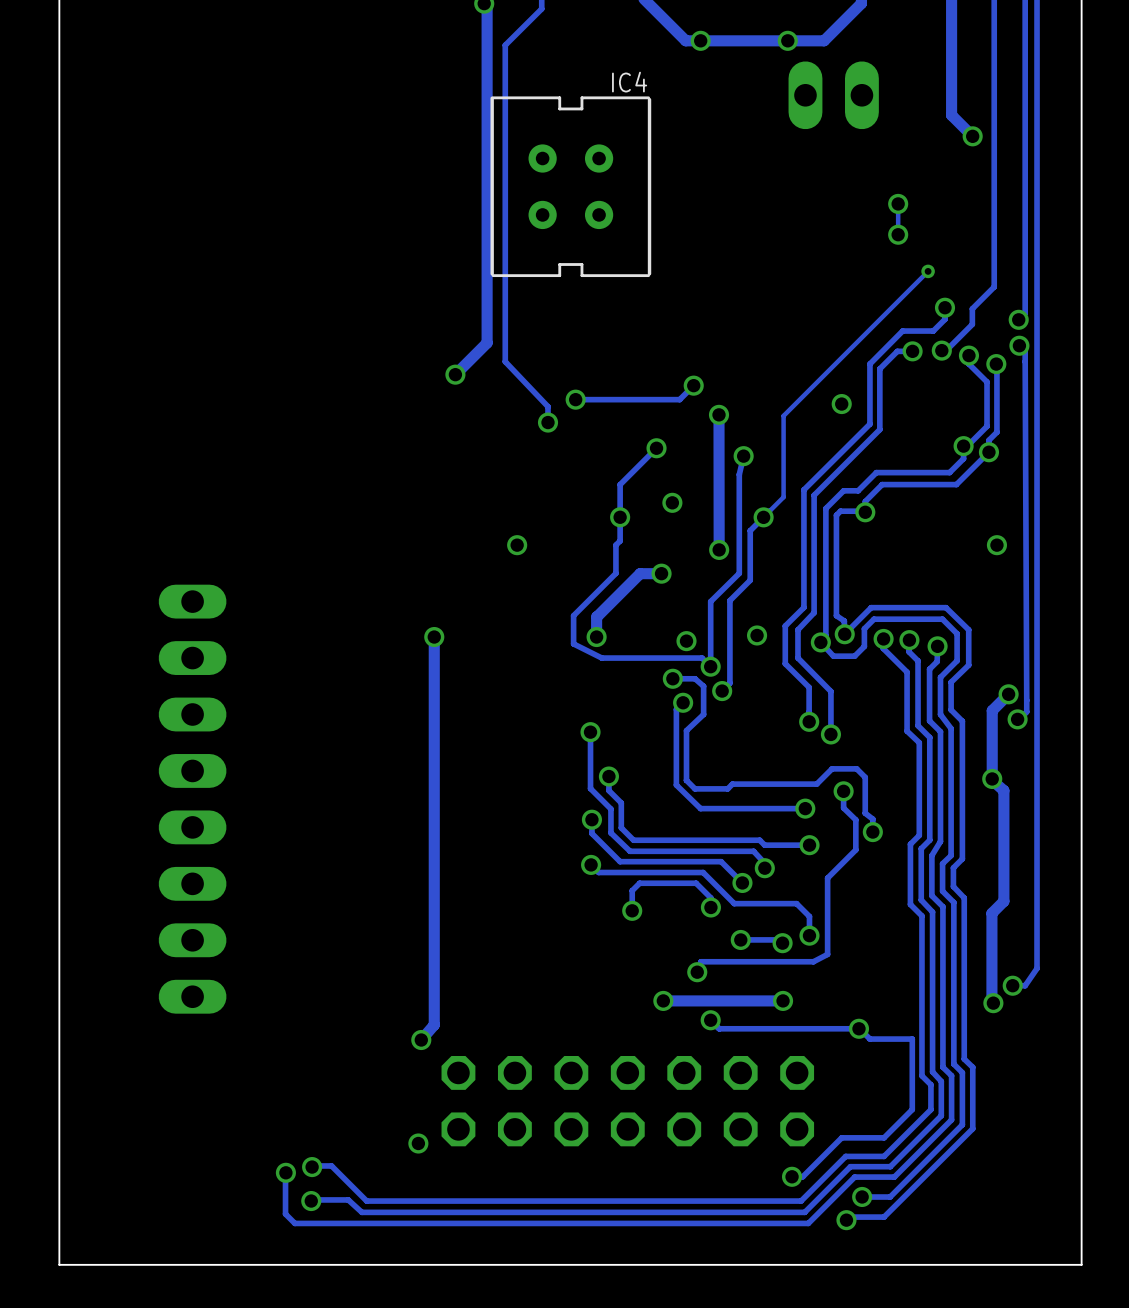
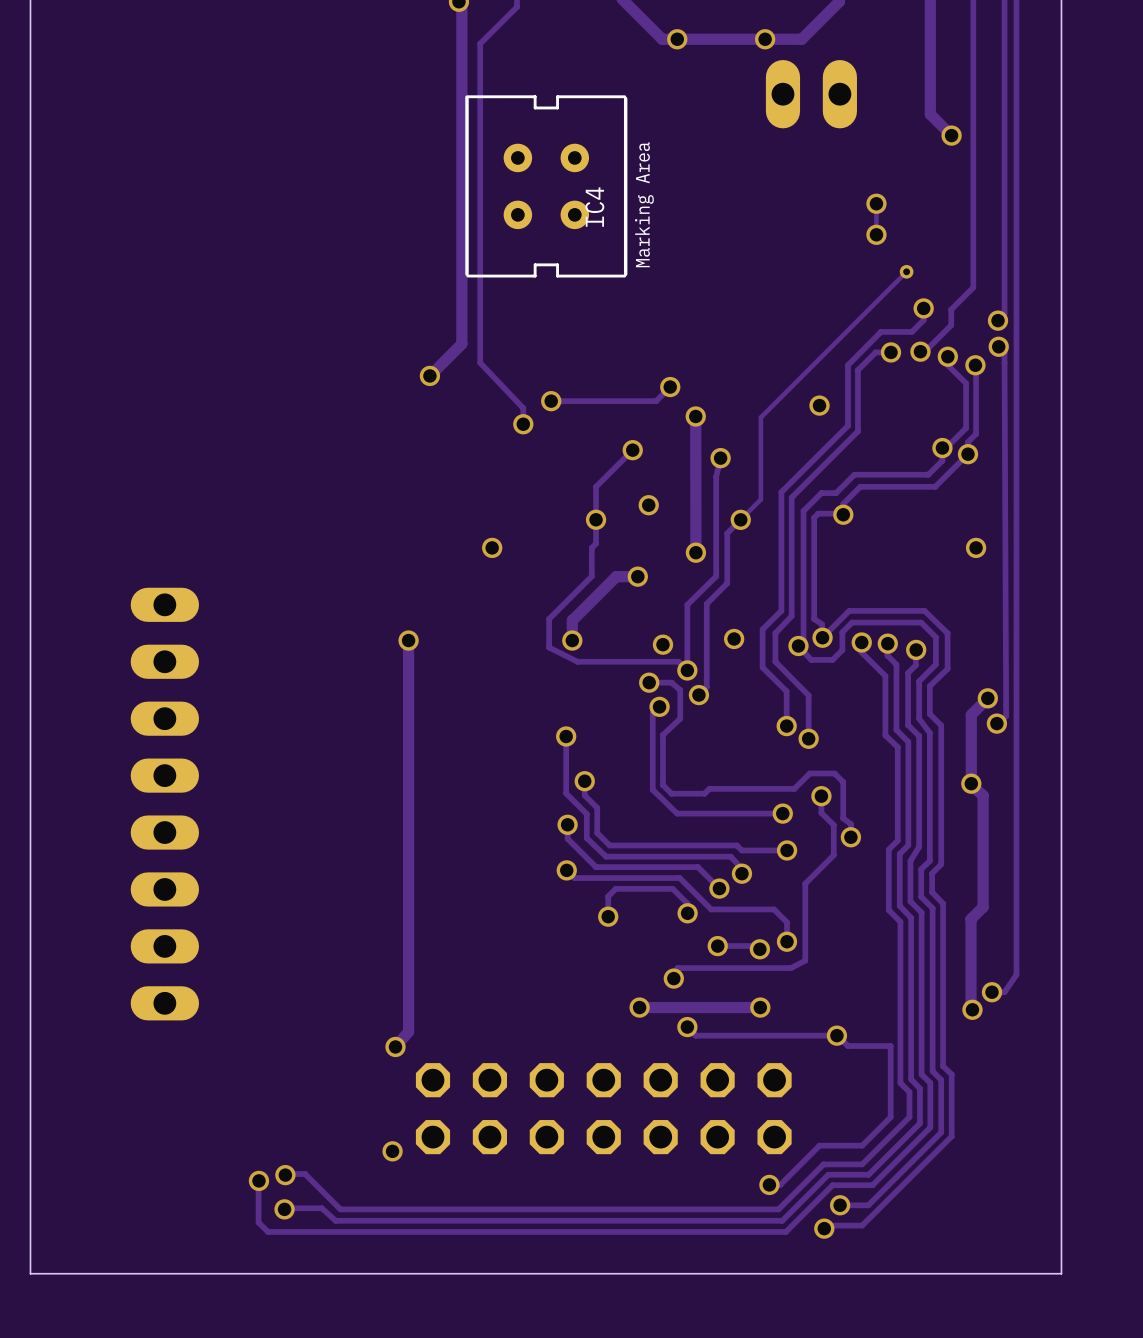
IC4 name rotation: 0° (629, 82) -> 90° counterclockwise (594, 207)
IC4 name position: IC4 (629, 82) -> IC4 (594, 207)
IC4 text: none -> Marking Area (644, 204)

